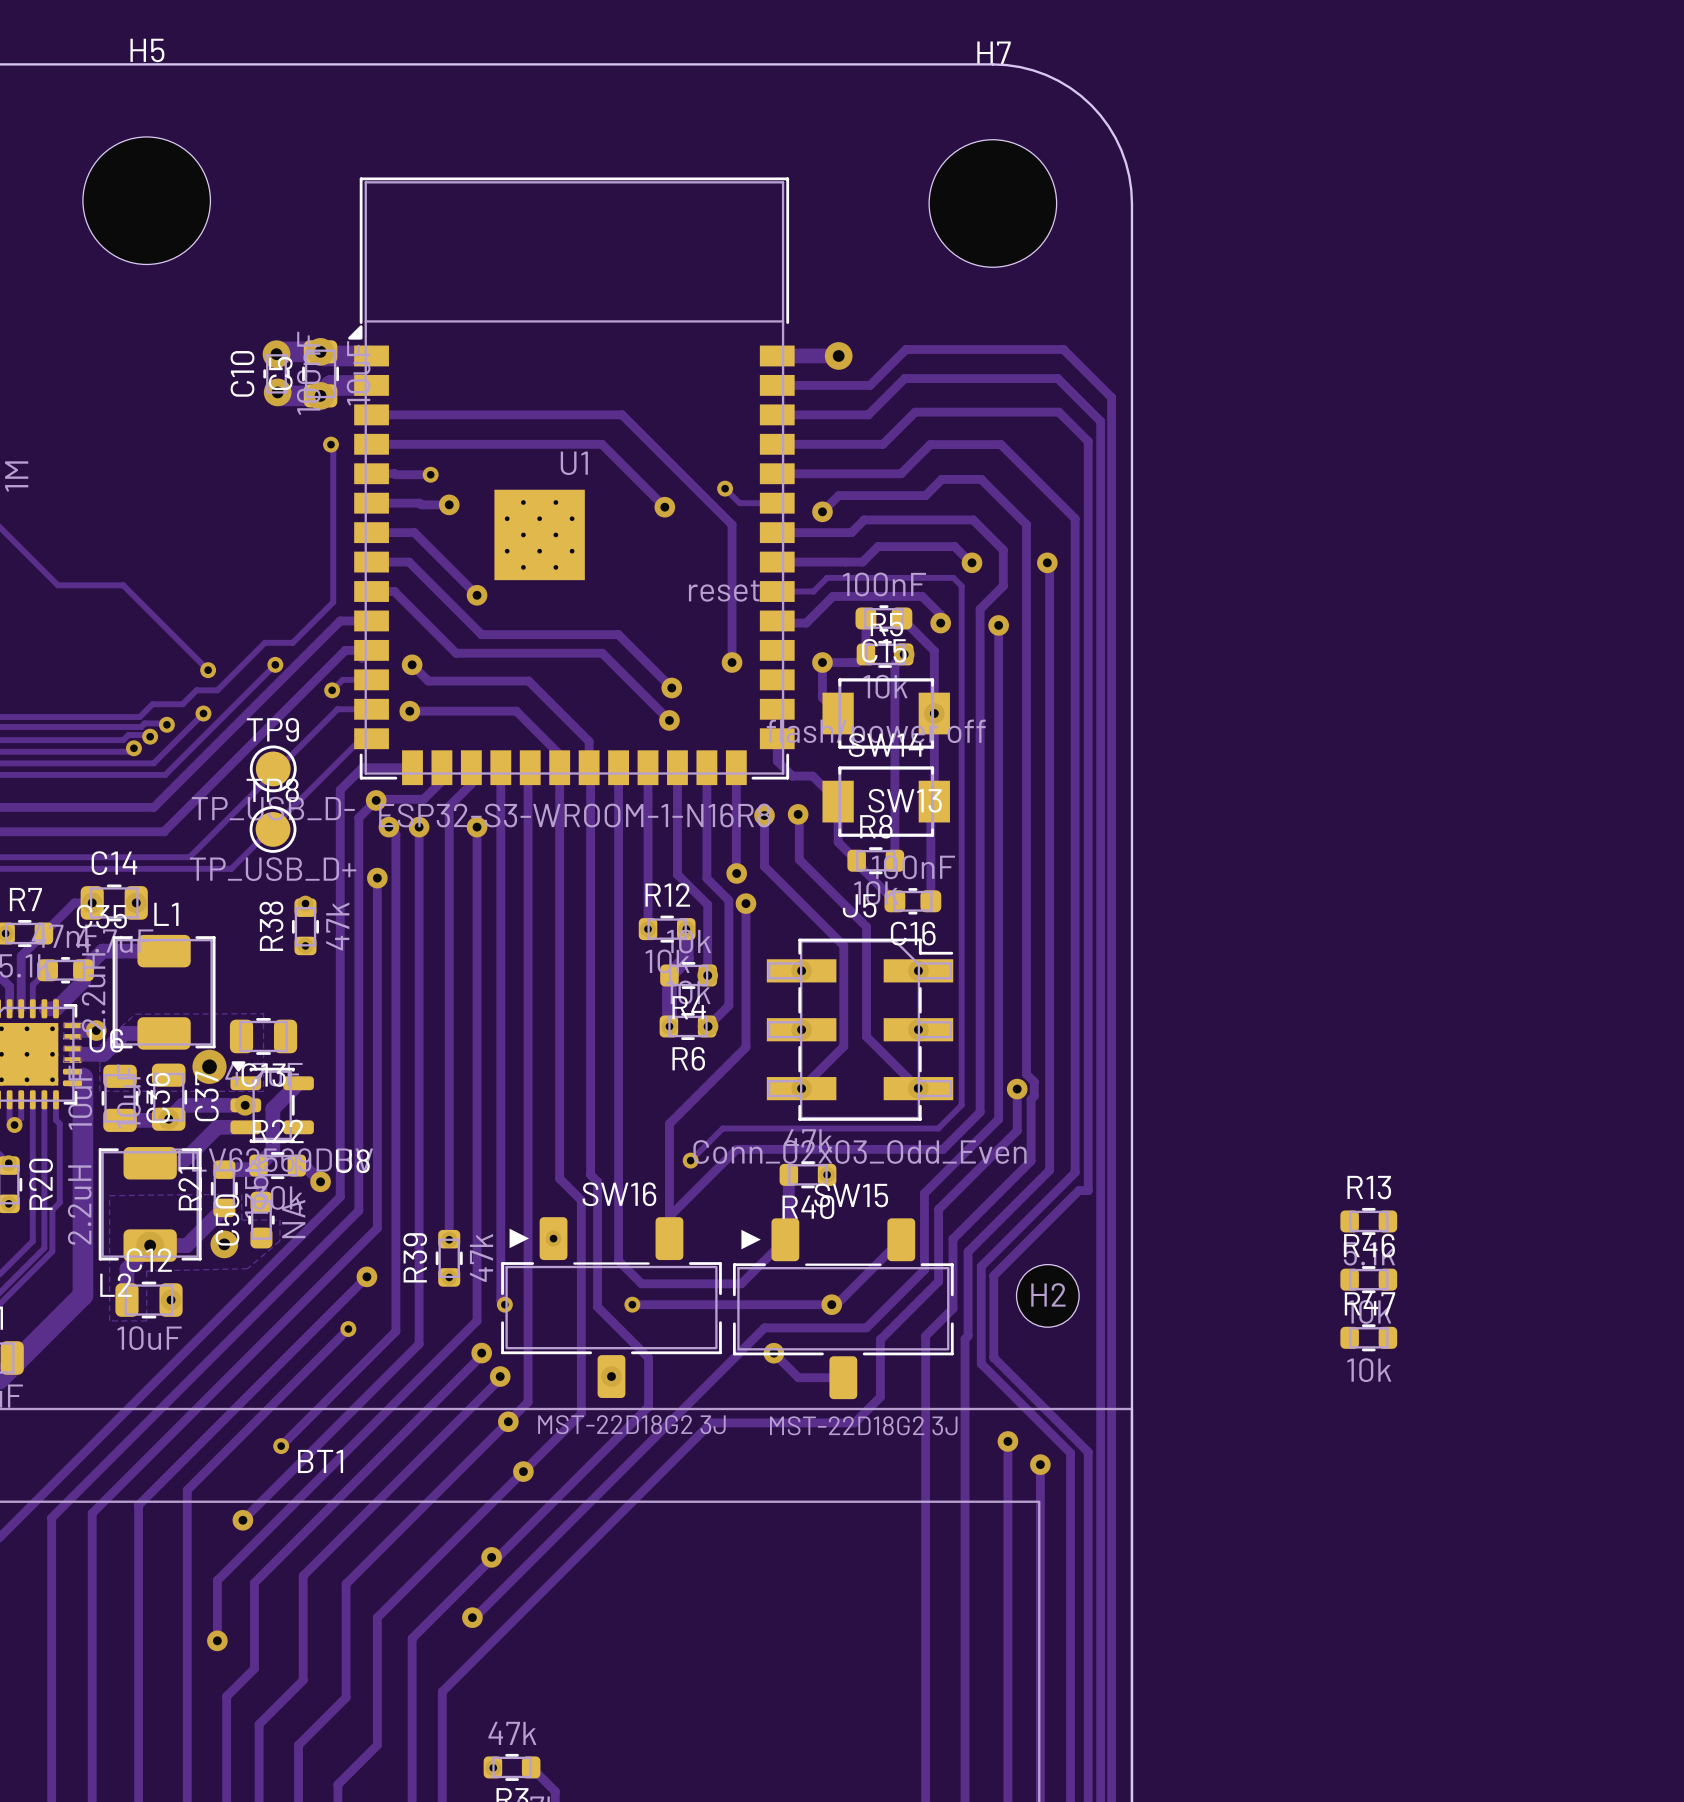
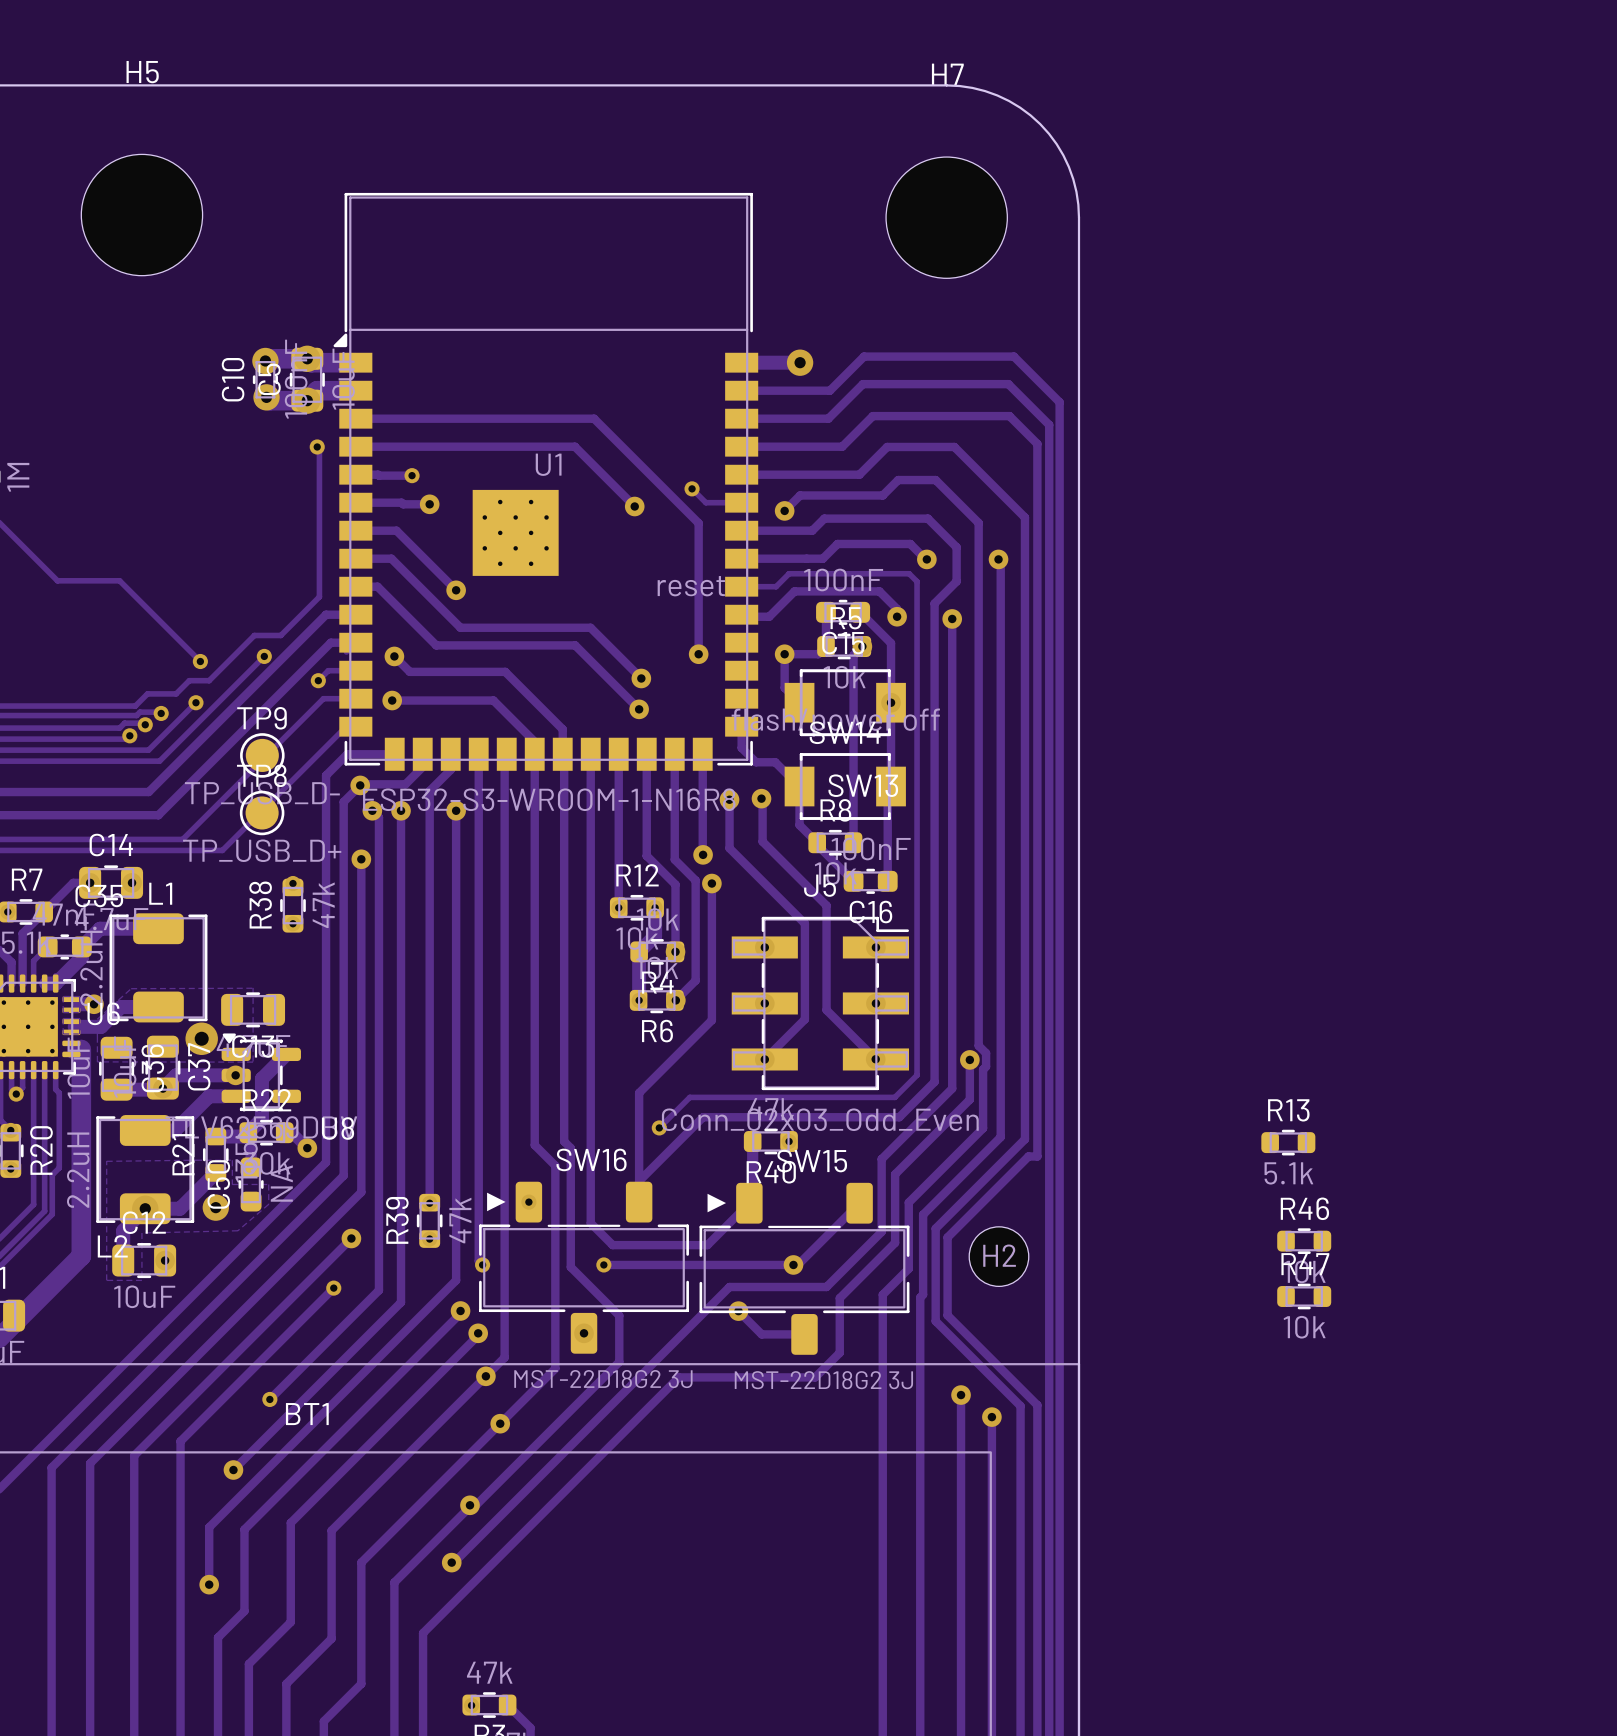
R13 position: (1368, 1221) -> (1288, 1142)

